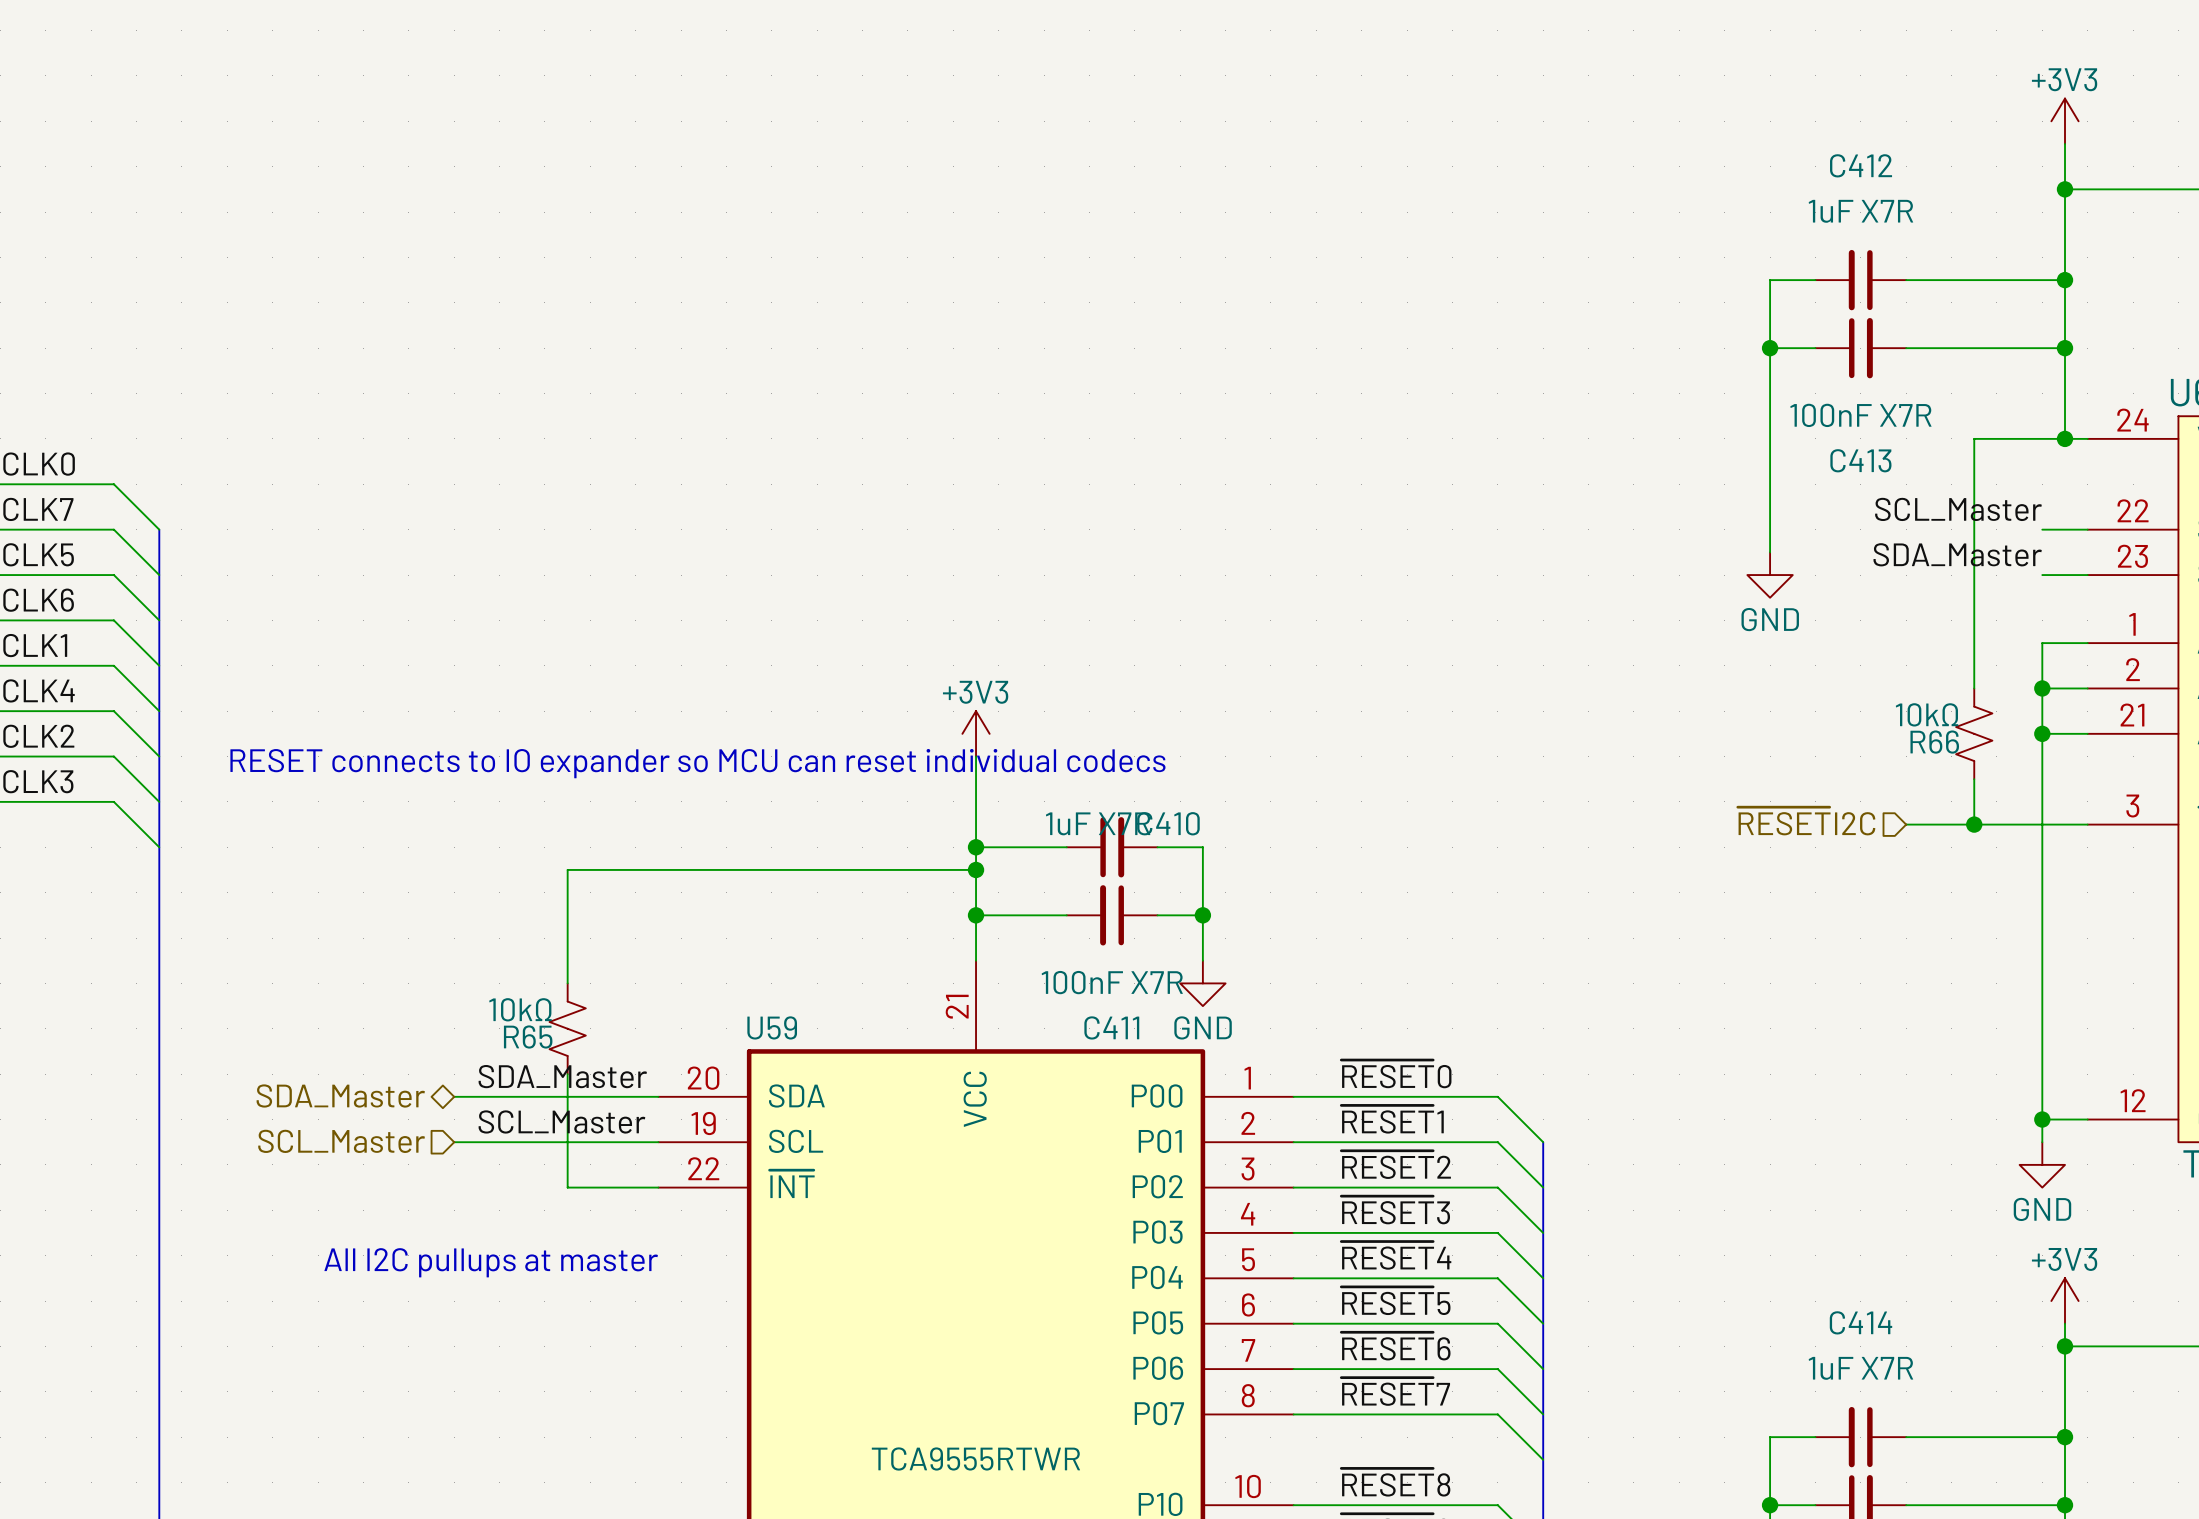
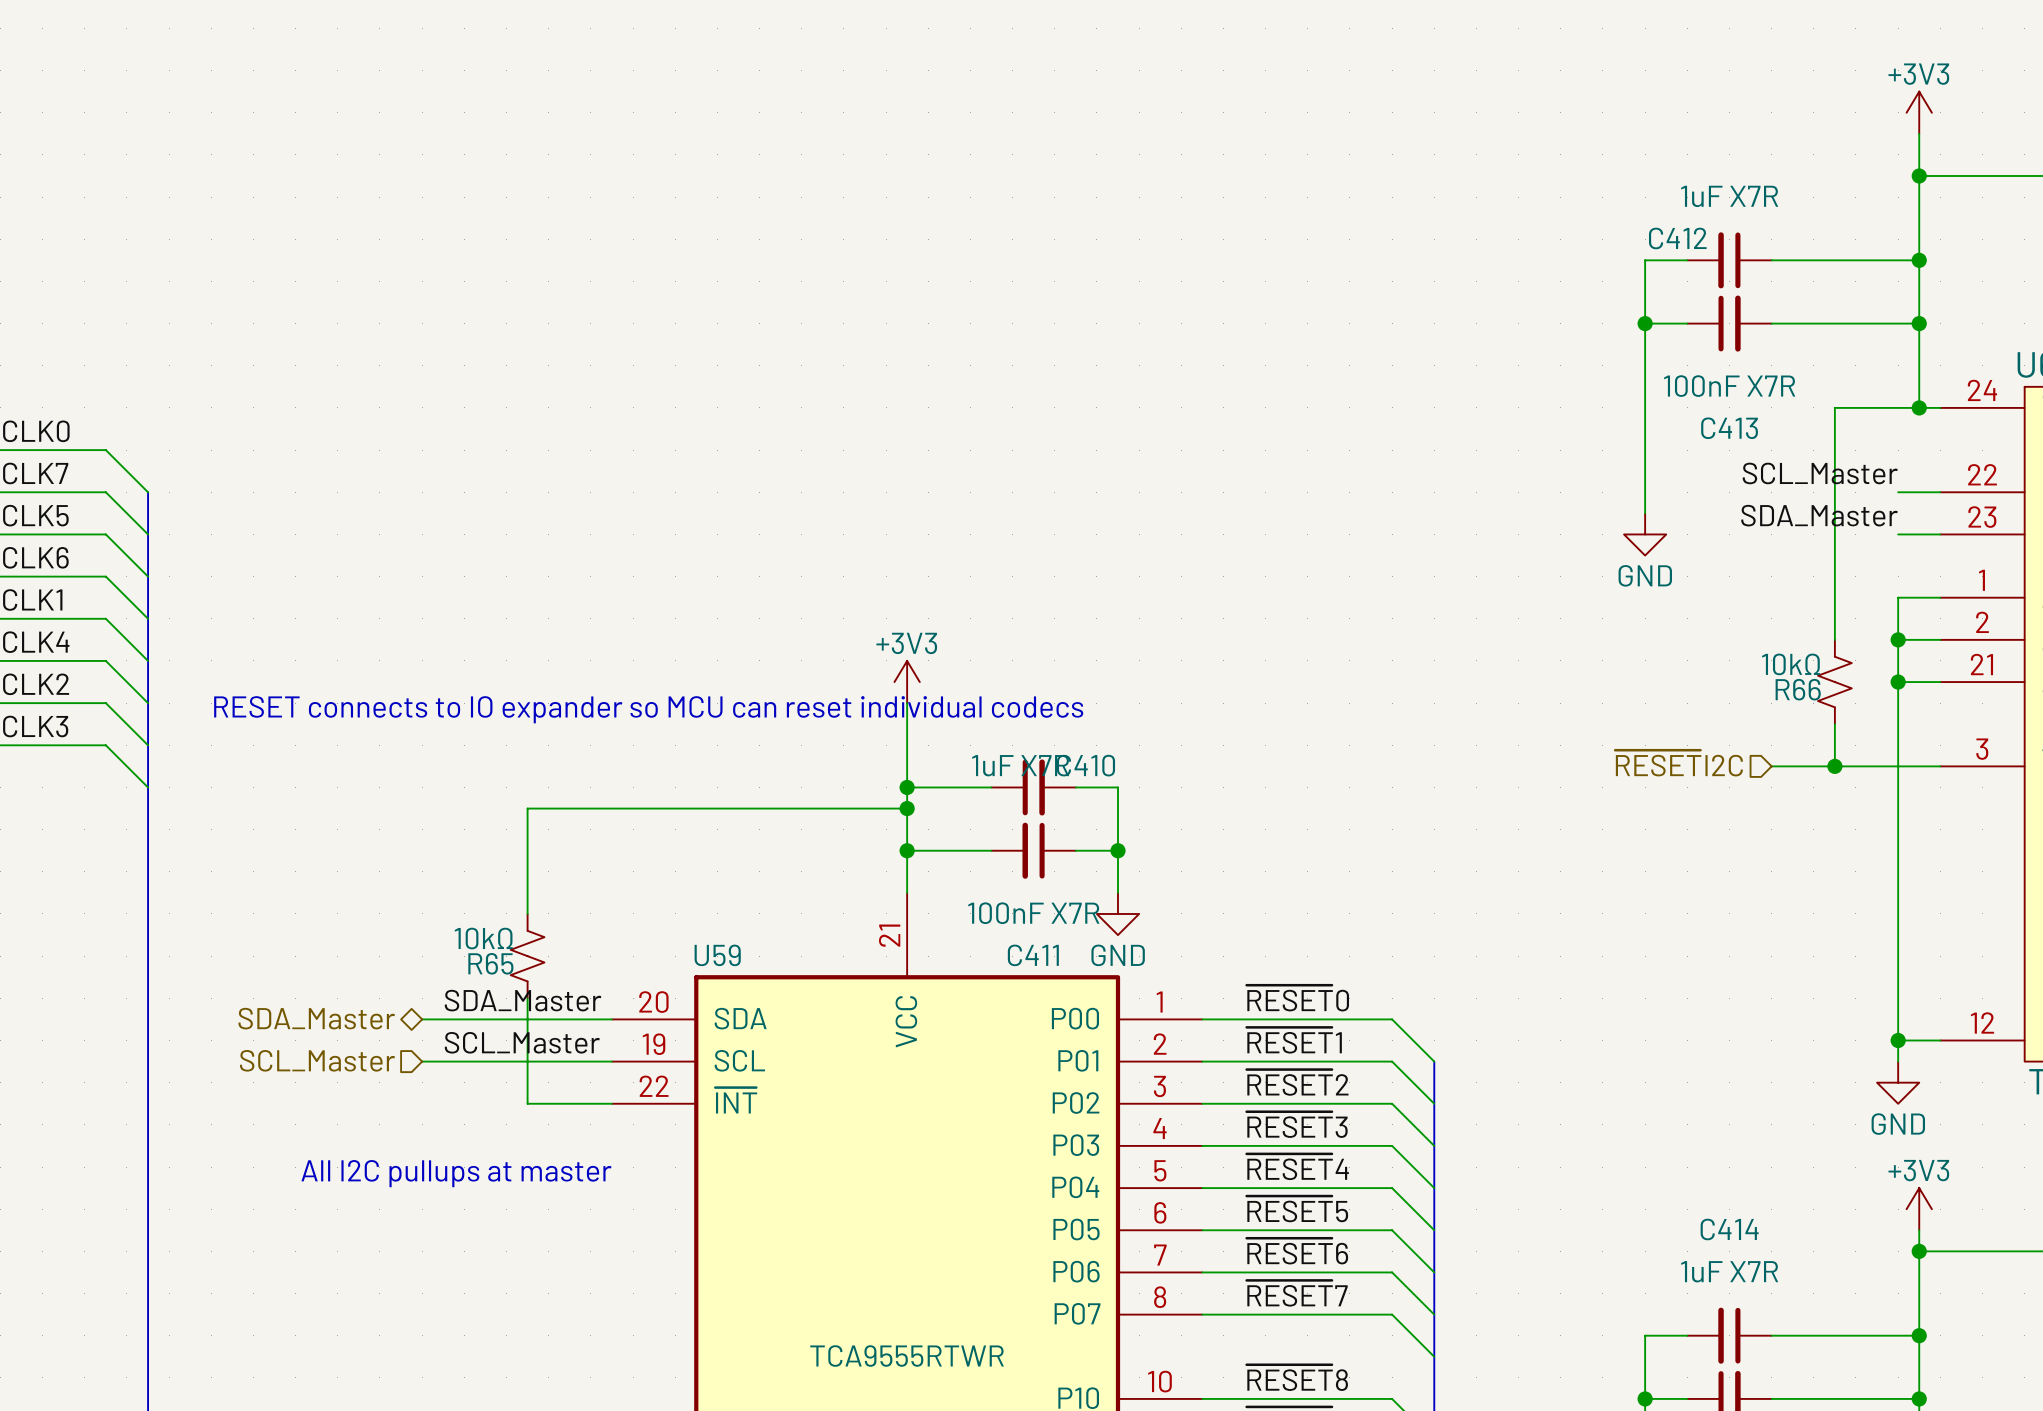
C412 name position: C412 (1861, 165) -> C412 (1677, 238)

